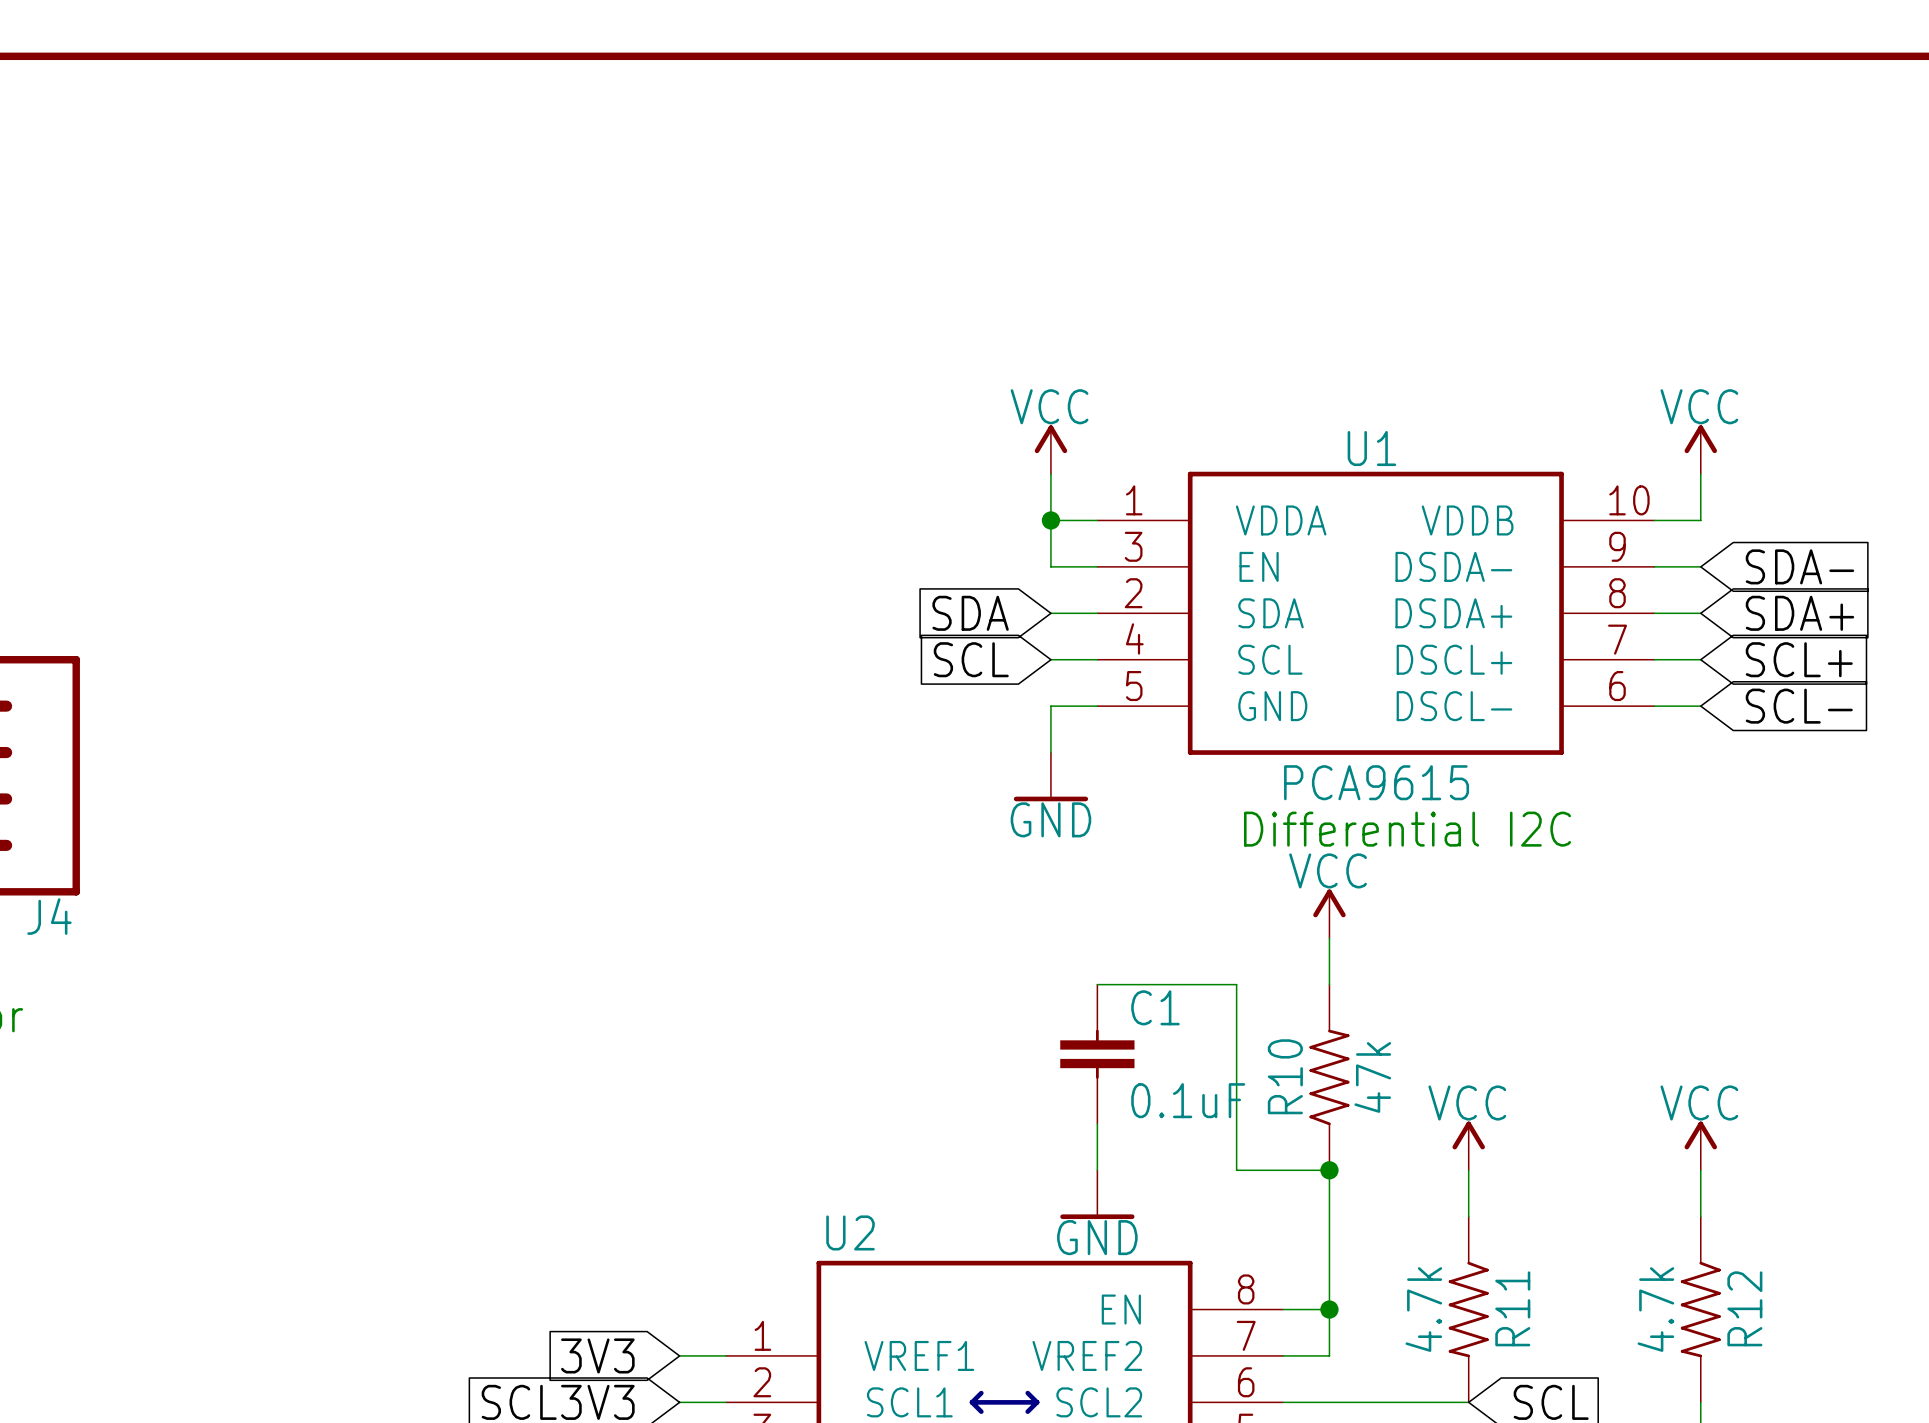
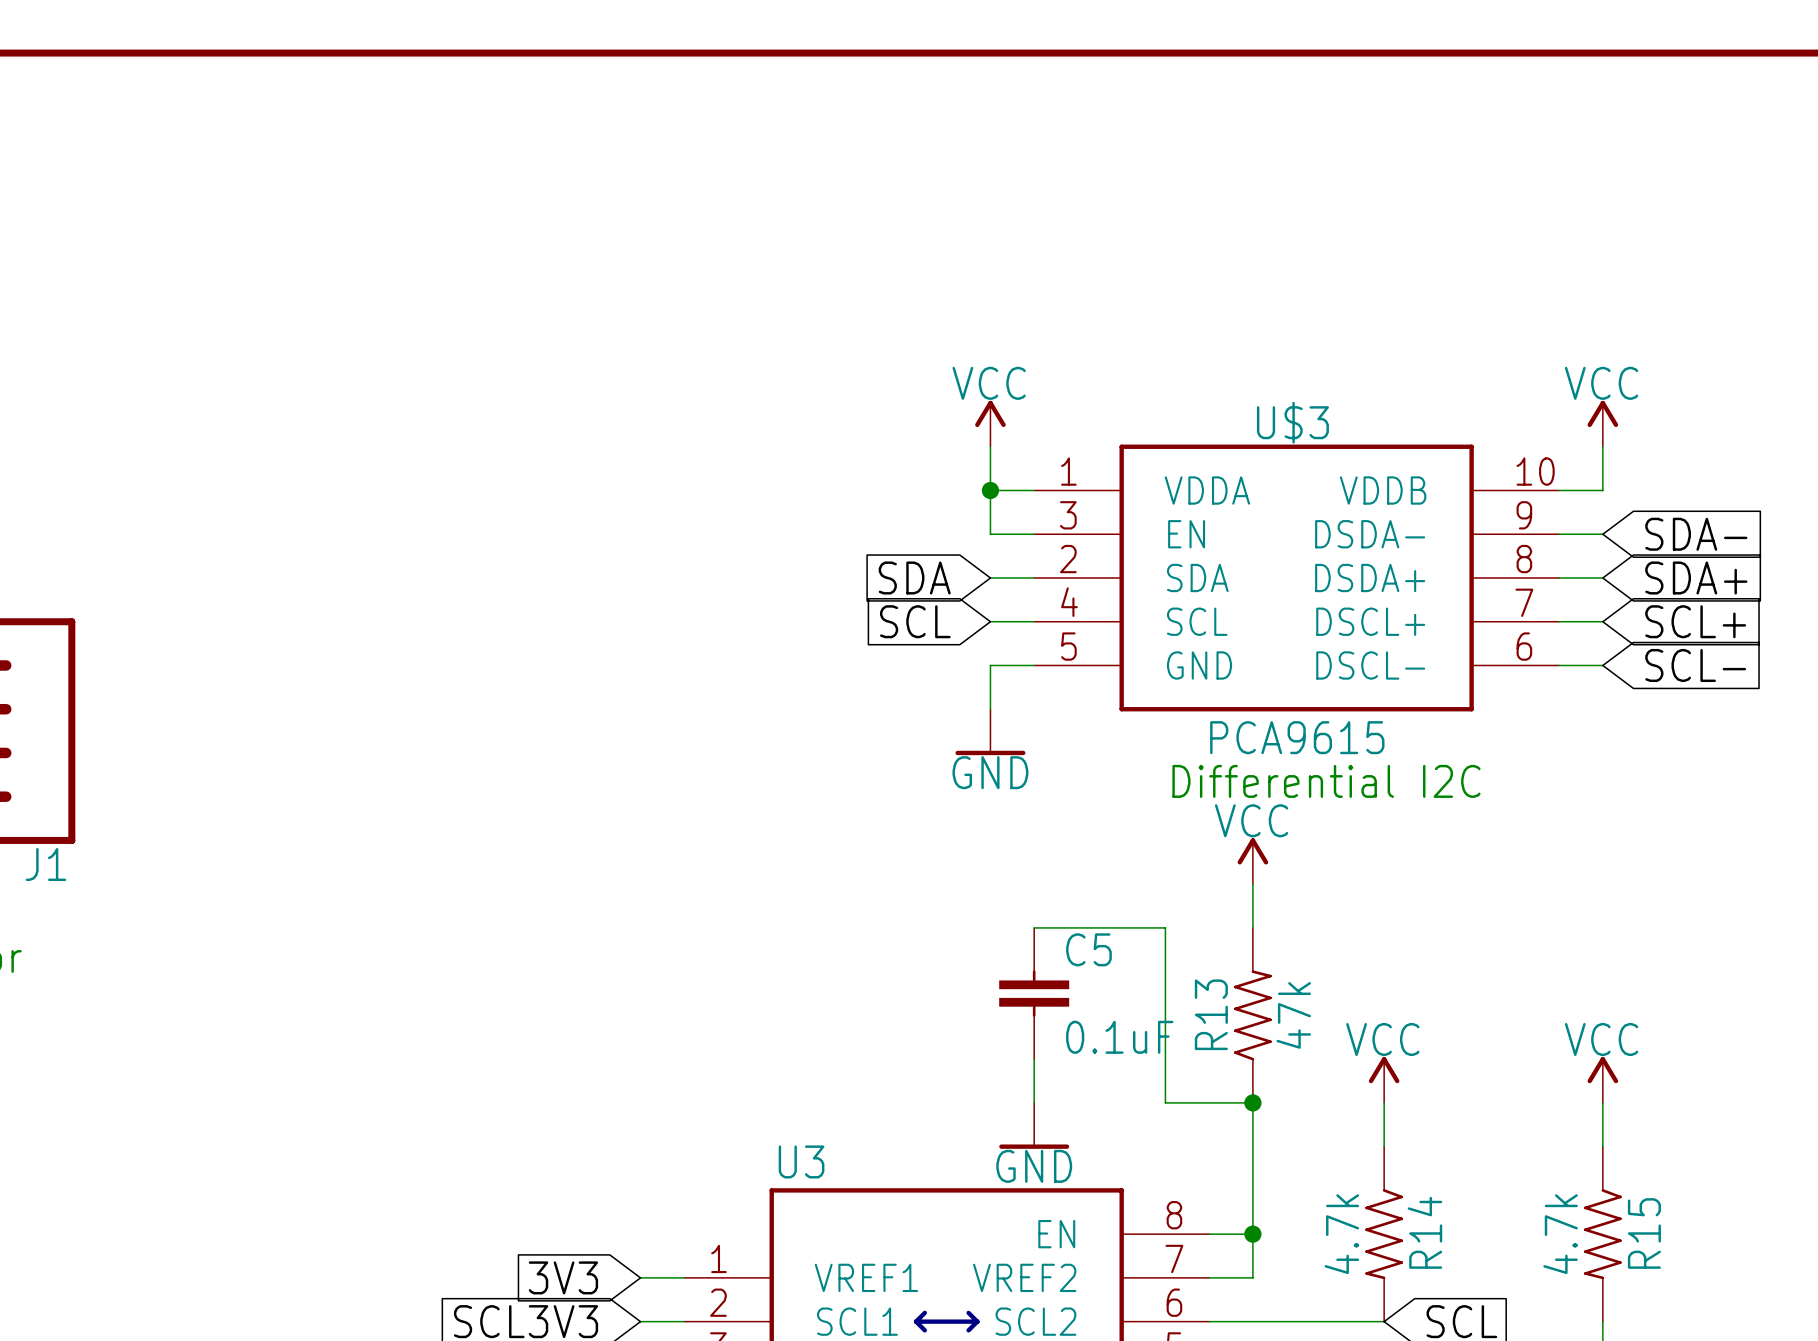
U1 name: U1 (1371, 448) -> U$3 (1292, 422)
J4 name: J4 (49, 916) -> J1 (45, 864)
C1 name: C1 (1155, 1007) -> C5 (1088, 949)
R10 name: R10 (1285, 1076) -> R13 (1211, 1014)
U2 name: U2 (850, 1232) -> U3 (801, 1161)
R11 name: R11 (1512, 1308) -> R14 (1424, 1232)
R12 name: R12 (1744, 1308) -> R15 (1644, 1233)

